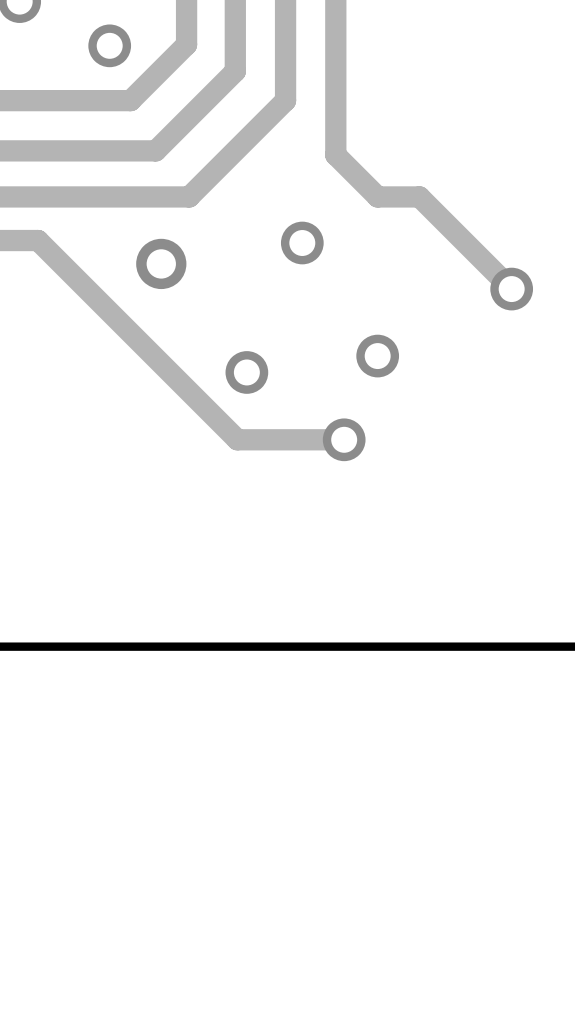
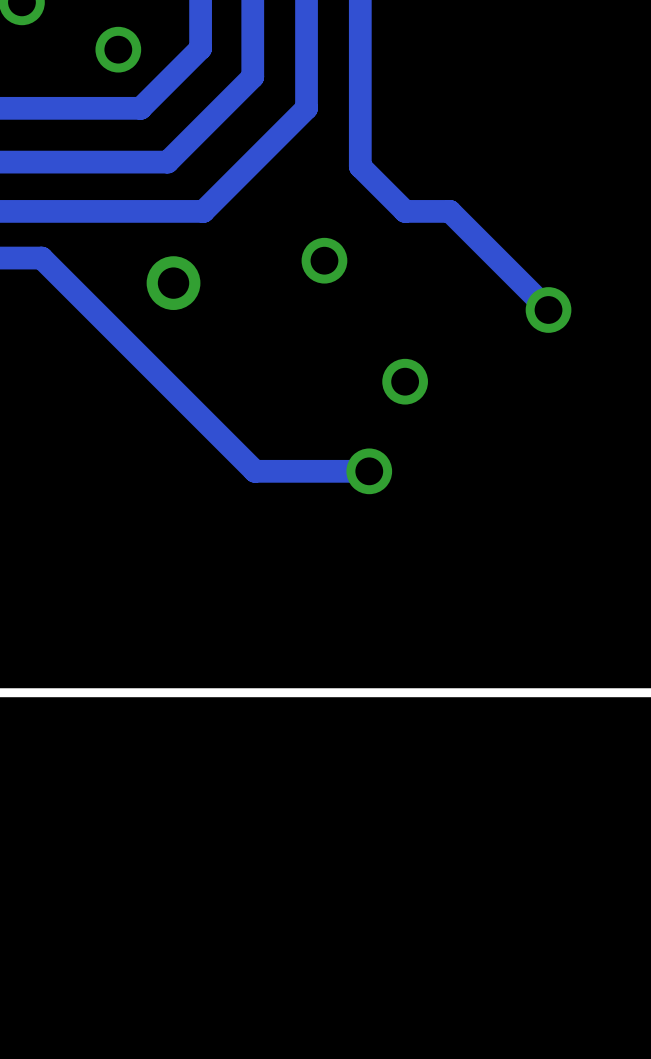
via: (246, 372) -> none

